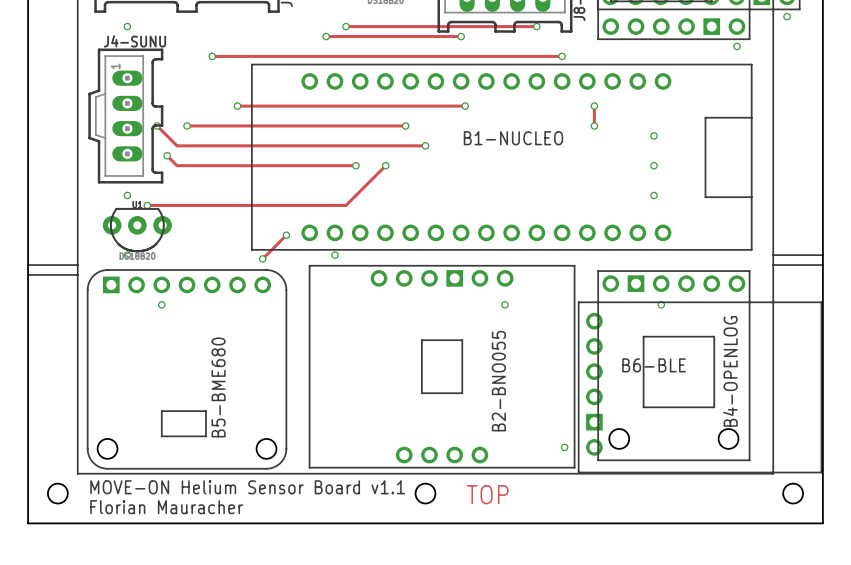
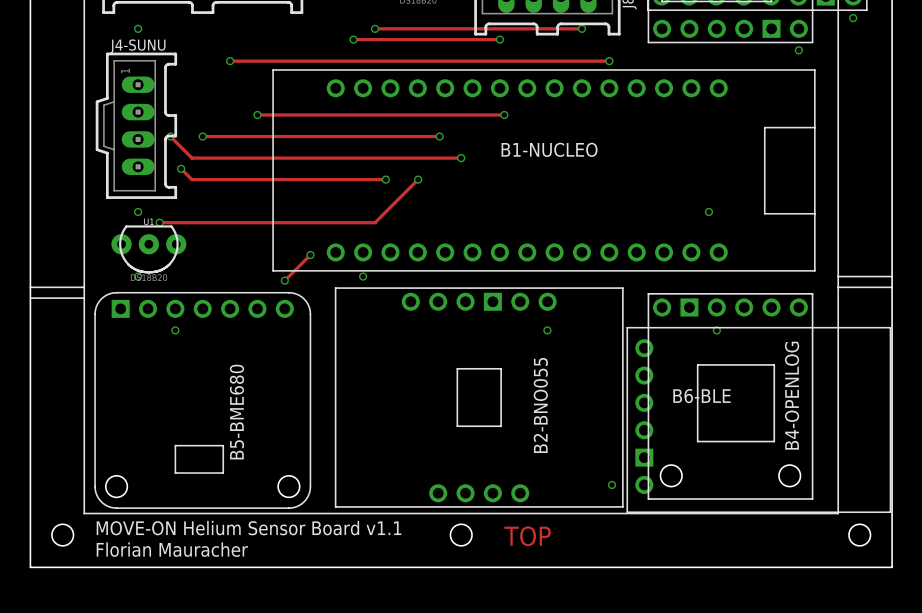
track: (594, 106) (594, 125) -> none
via: (594, 106) -> none
via: (594, 125) -> none
via: (654, 135) -> none
via: (654, 165) -> none

